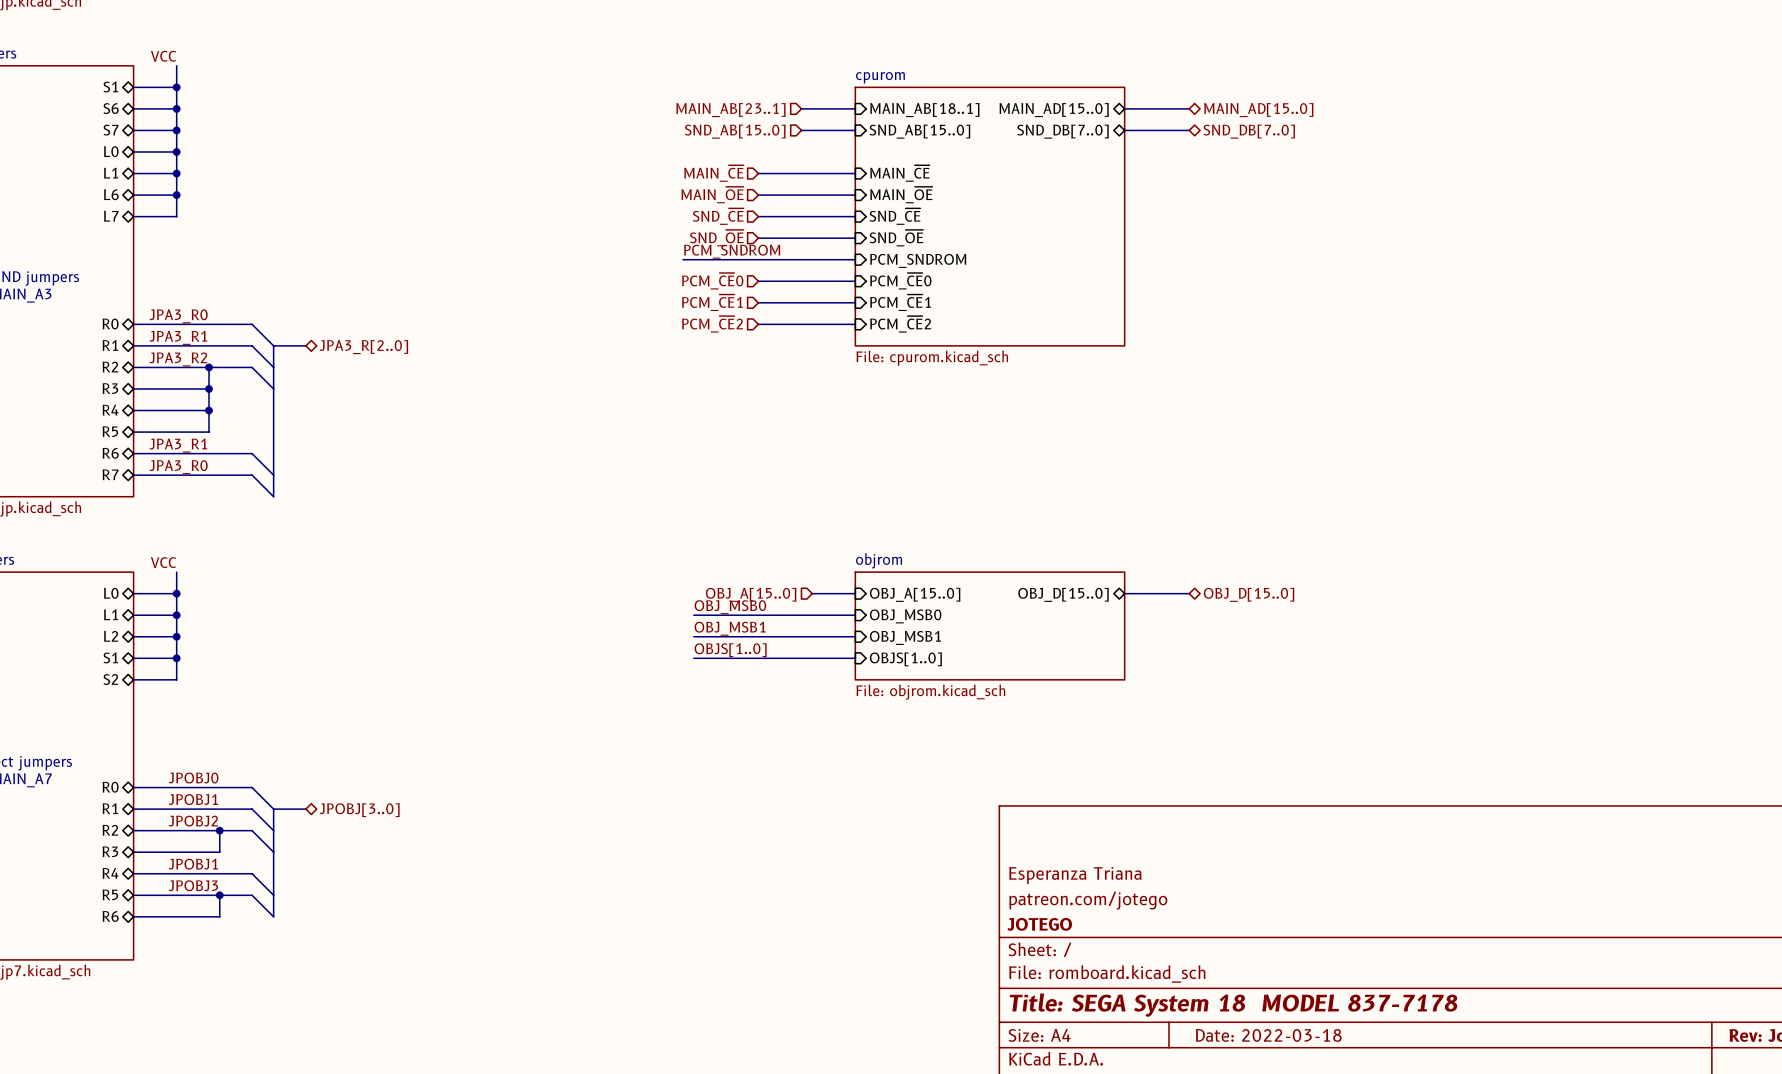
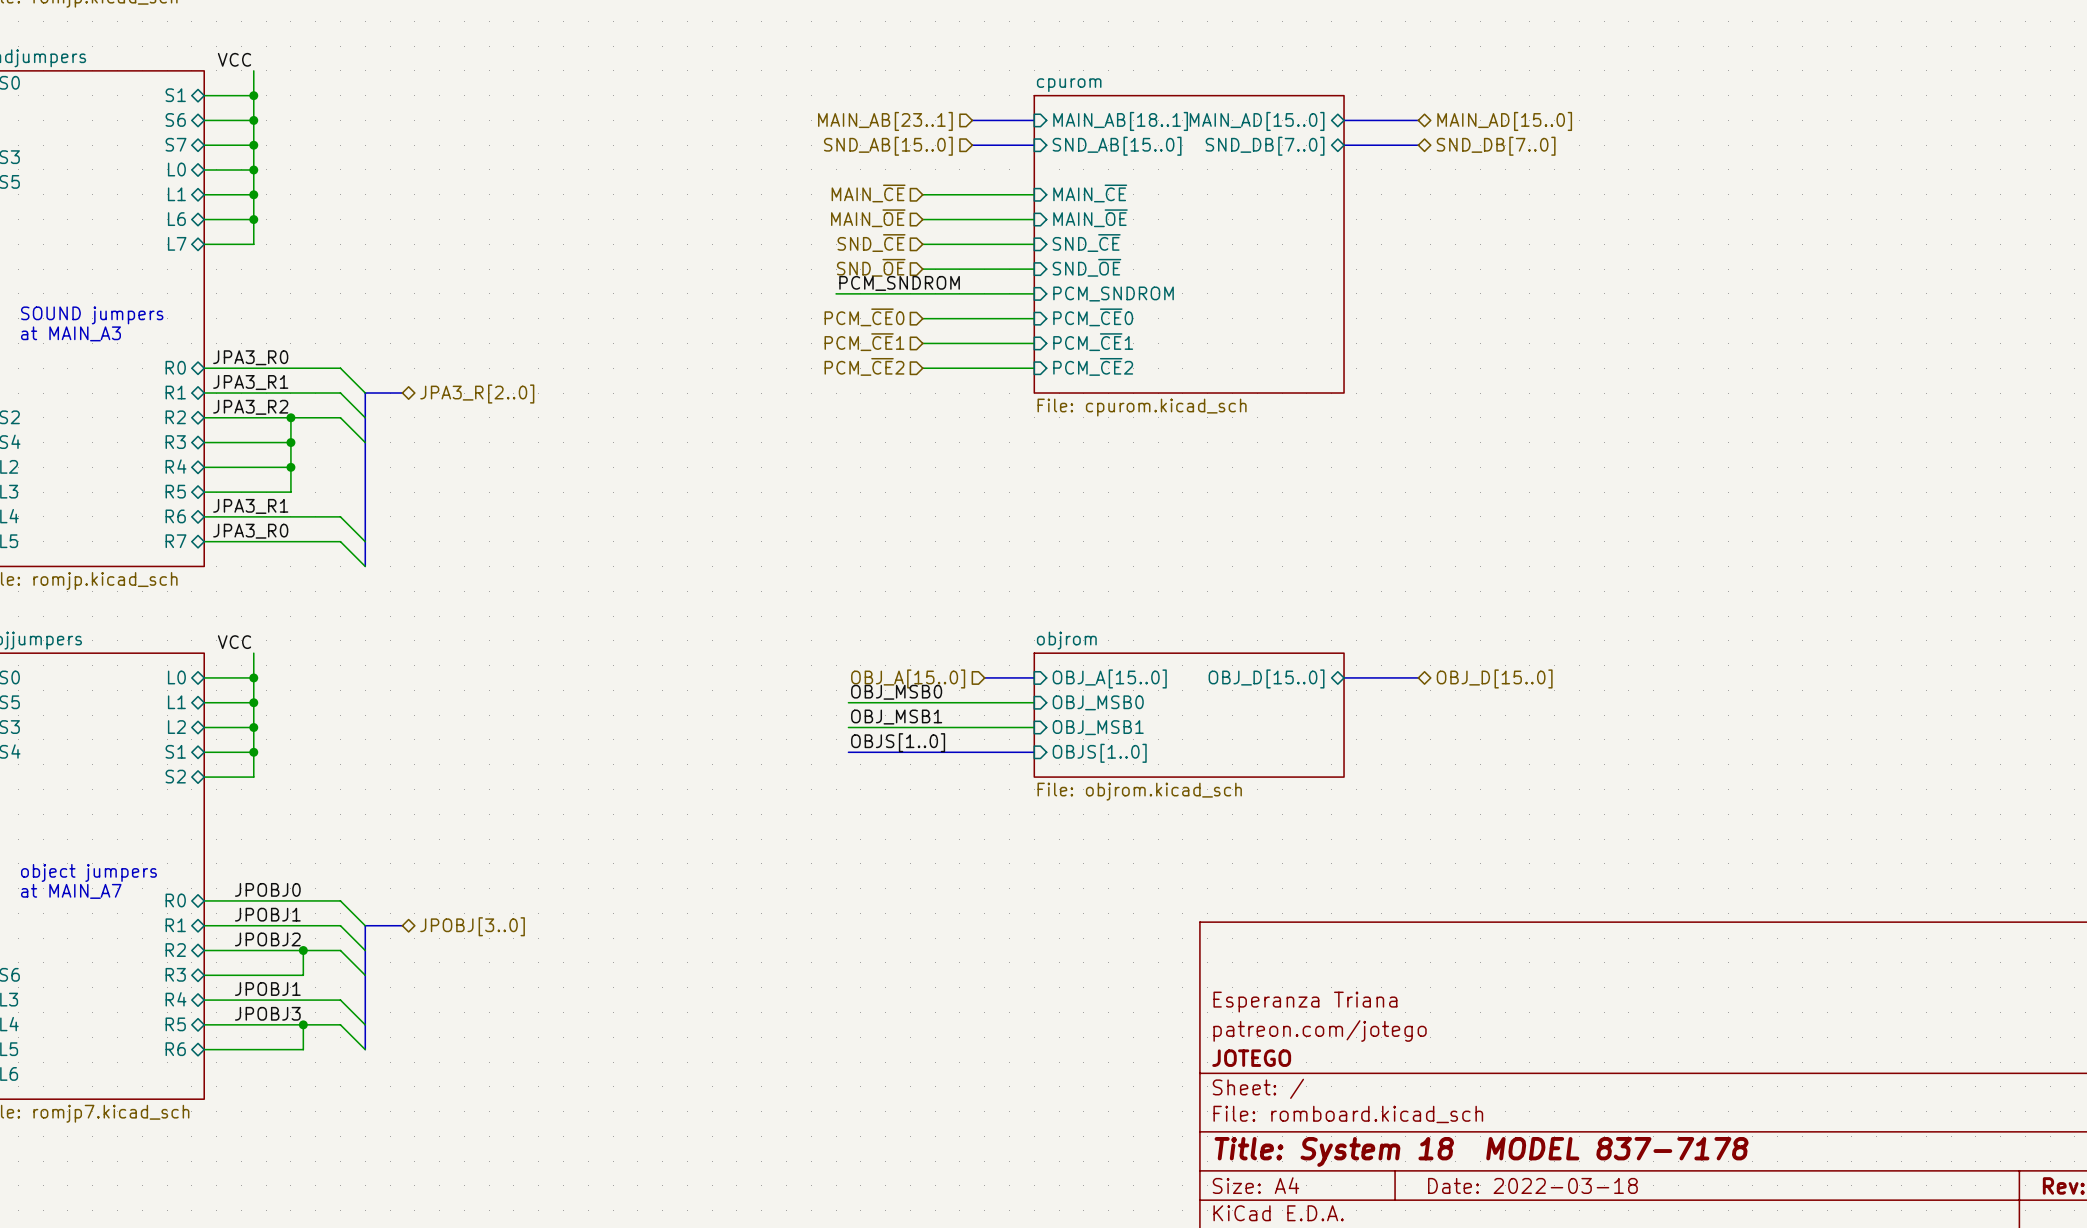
title block: Title: SEGA System 18 MODEL 837-7178 (1233, 1005) -> Title: System 18 MODEL 837-7178 (1481, 1151)

